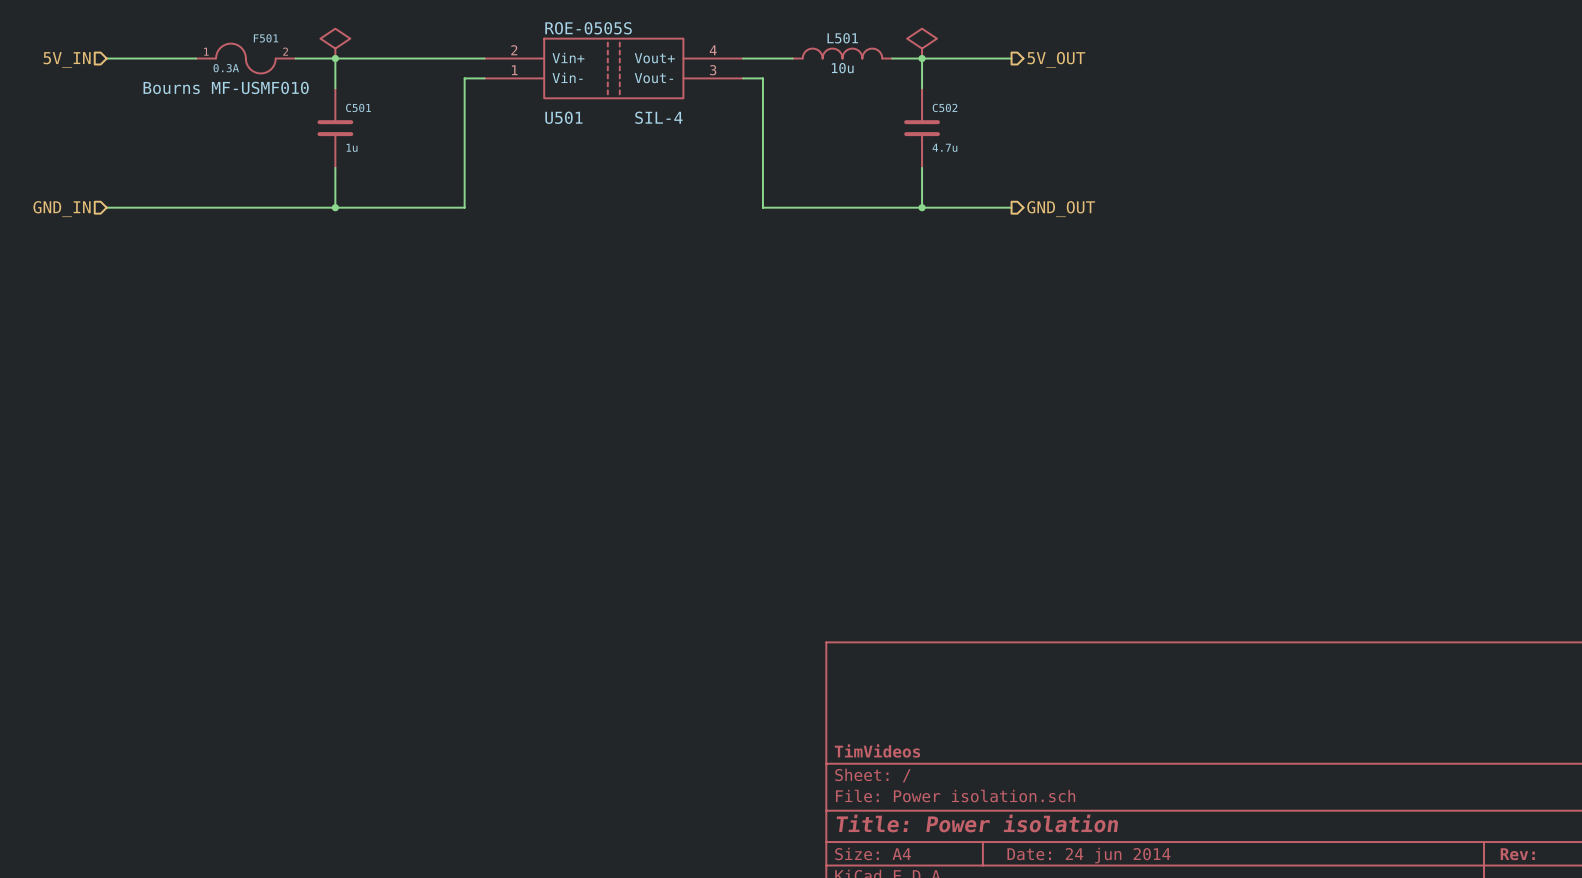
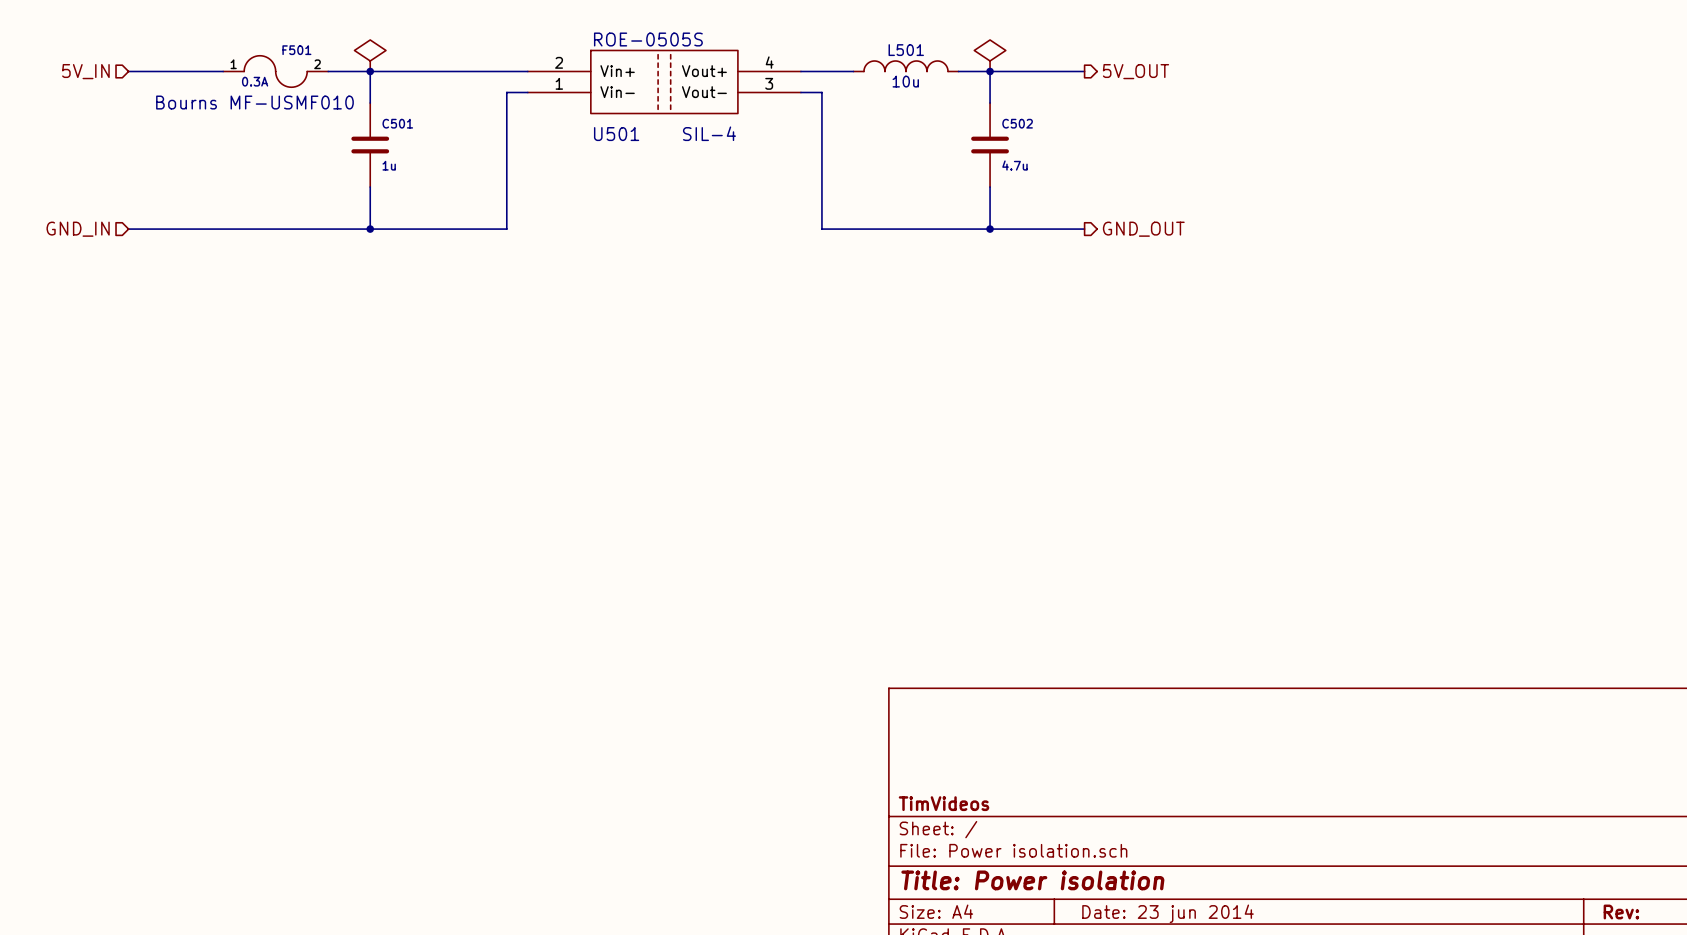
title block: Date: 24 jun 2014 (1088, 855) -> Date: 23 jun 2014 (1168, 913)

